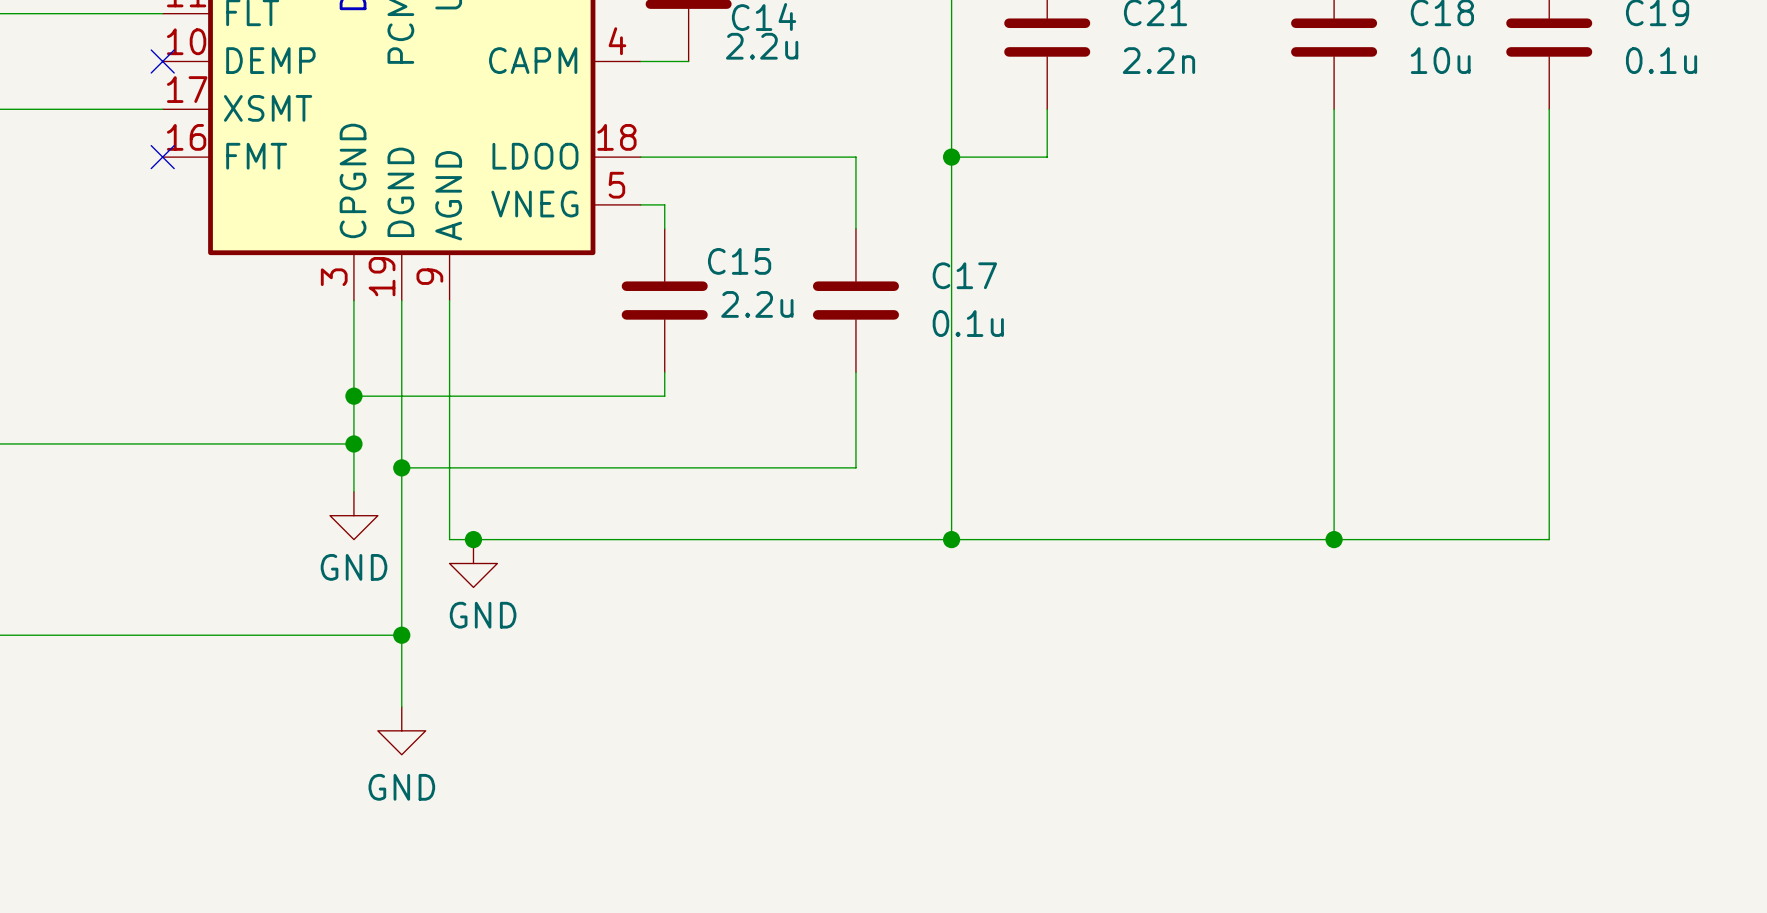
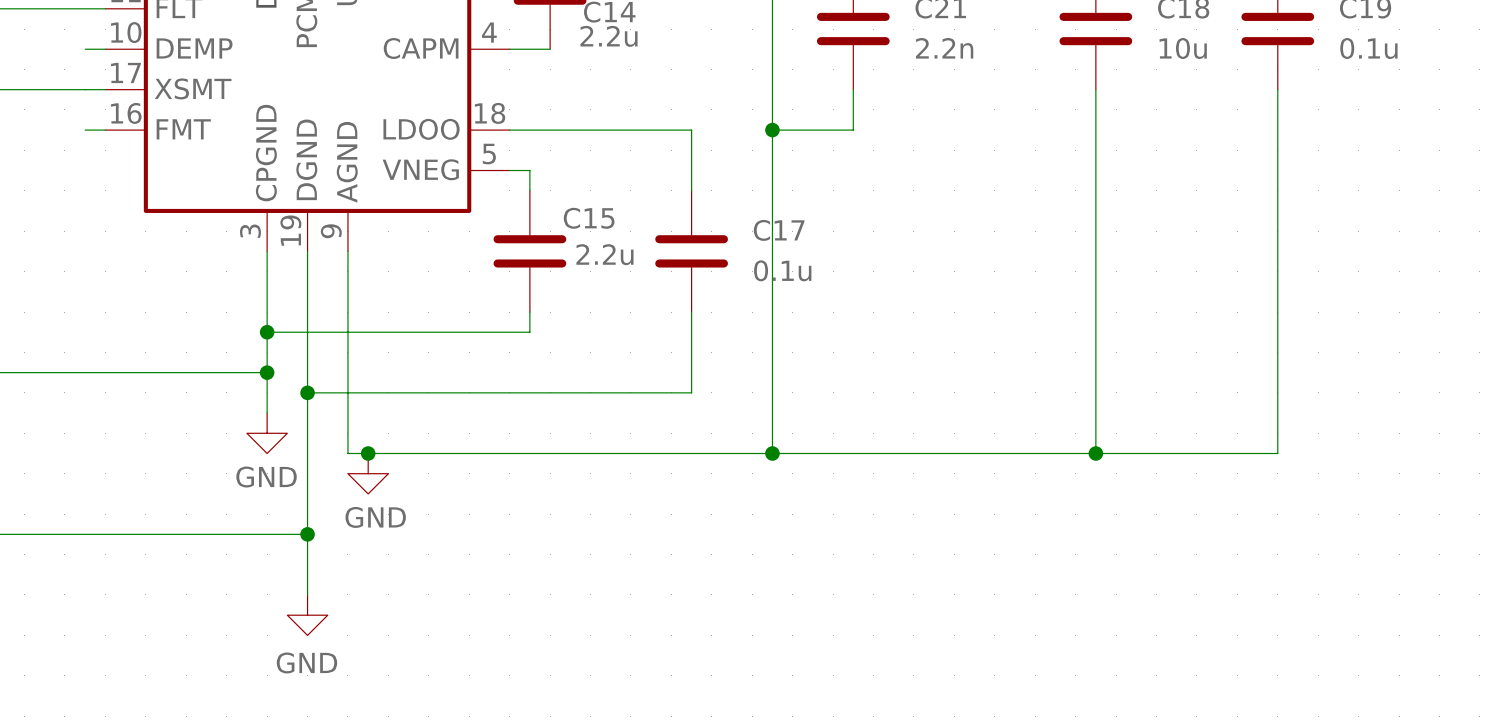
wire: none -> (85, 49) (105, 49)
no-connect mark: (162, 61) -> none
wire: none -> (85, 130) (105, 130)
no-connect mark: (162, 157) -> none

